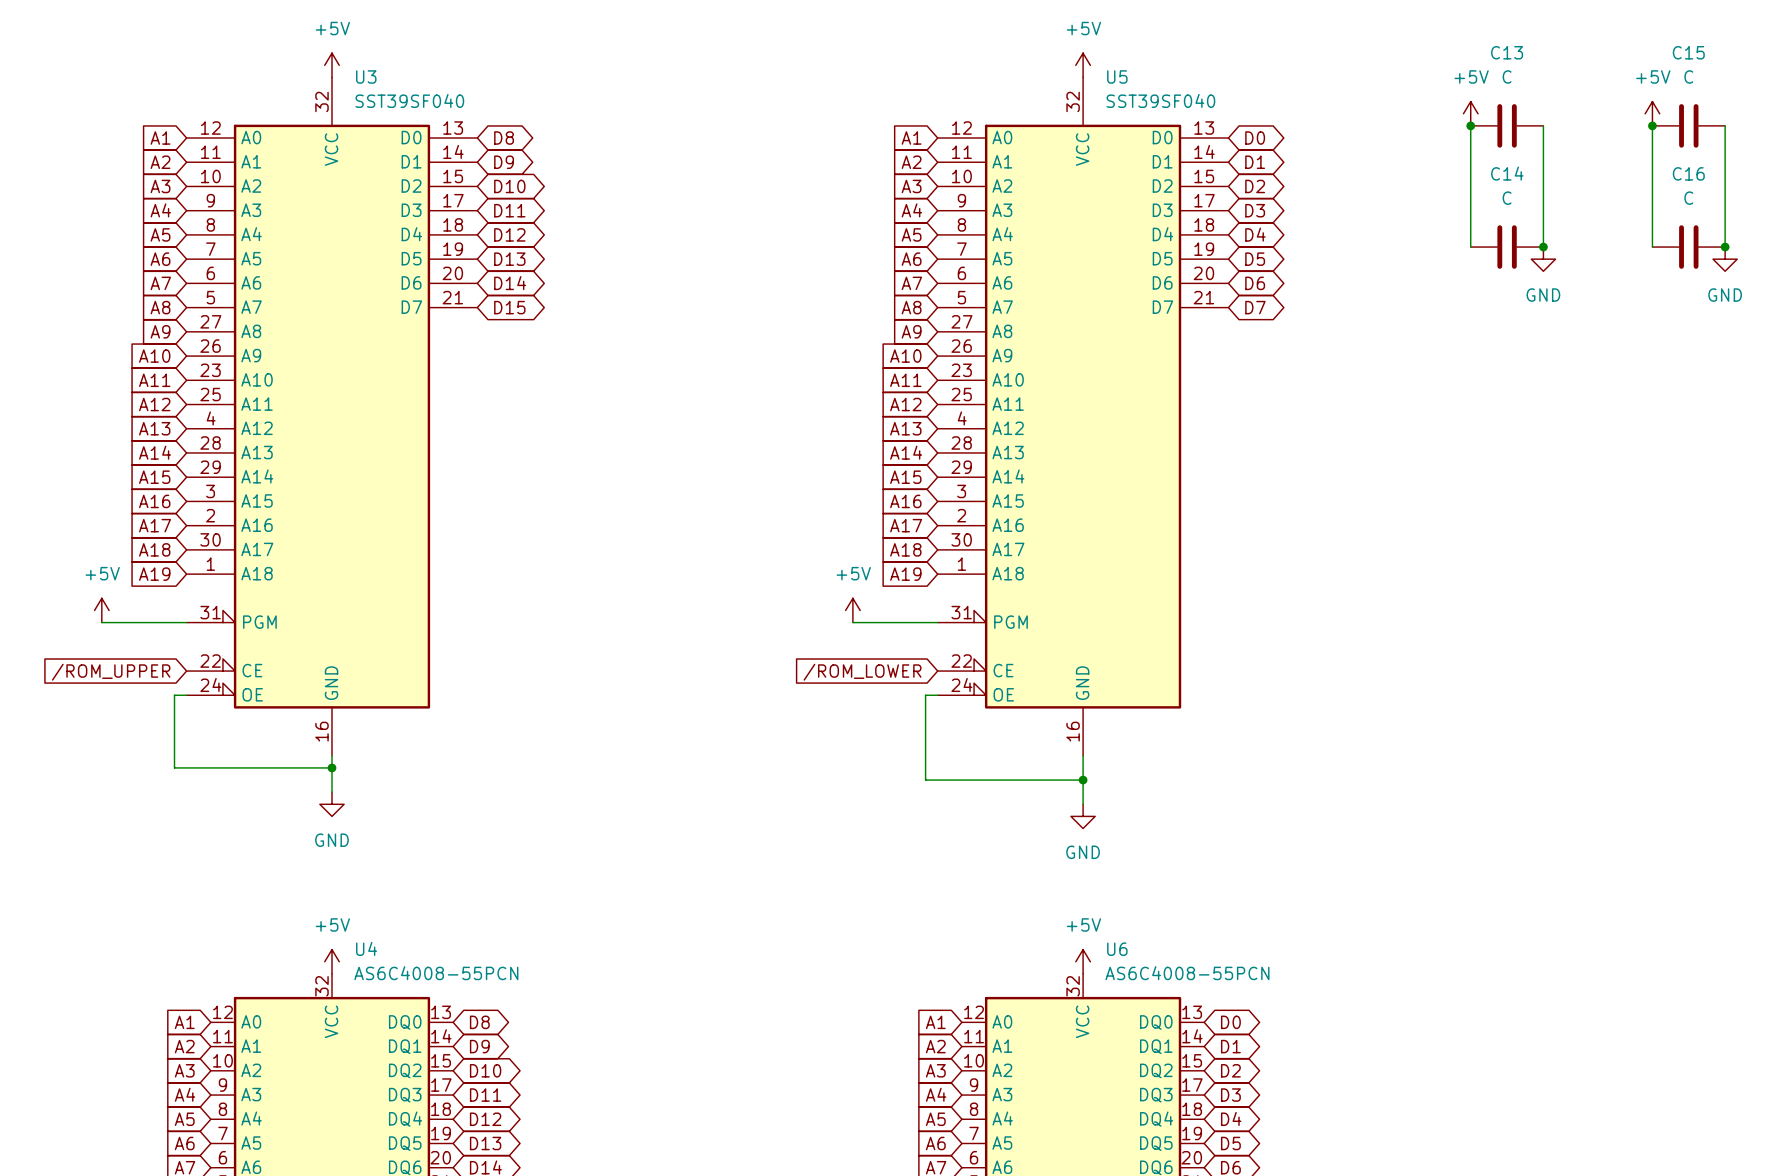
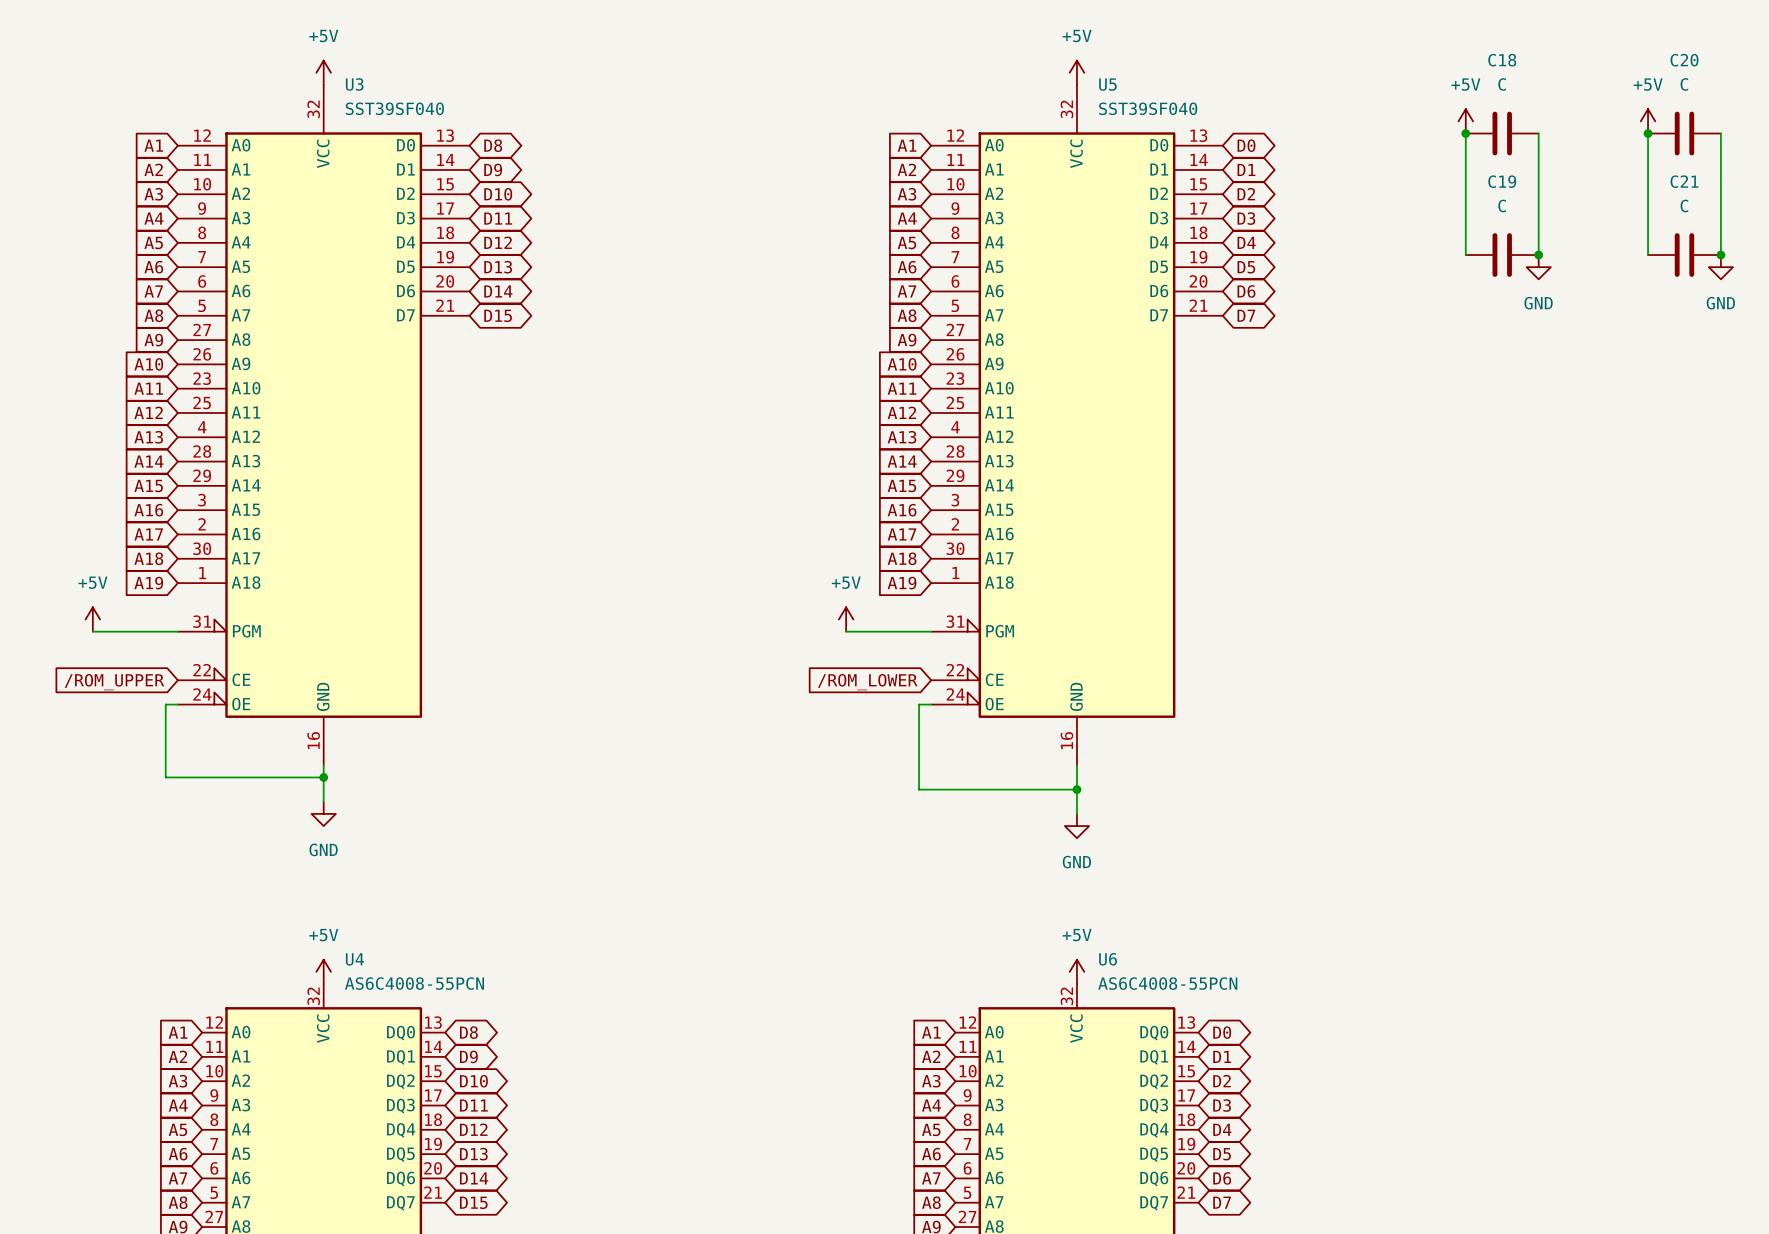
C13 name: C13 (1507, 52) -> C18 (1502, 60)
C15 name: C15 (1688, 52) -> C20 (1684, 60)
C14 name: C14 (1507, 173) -> C19 (1502, 181)
C16 name: C16 (1688, 173) -> C21 (1684, 181)

